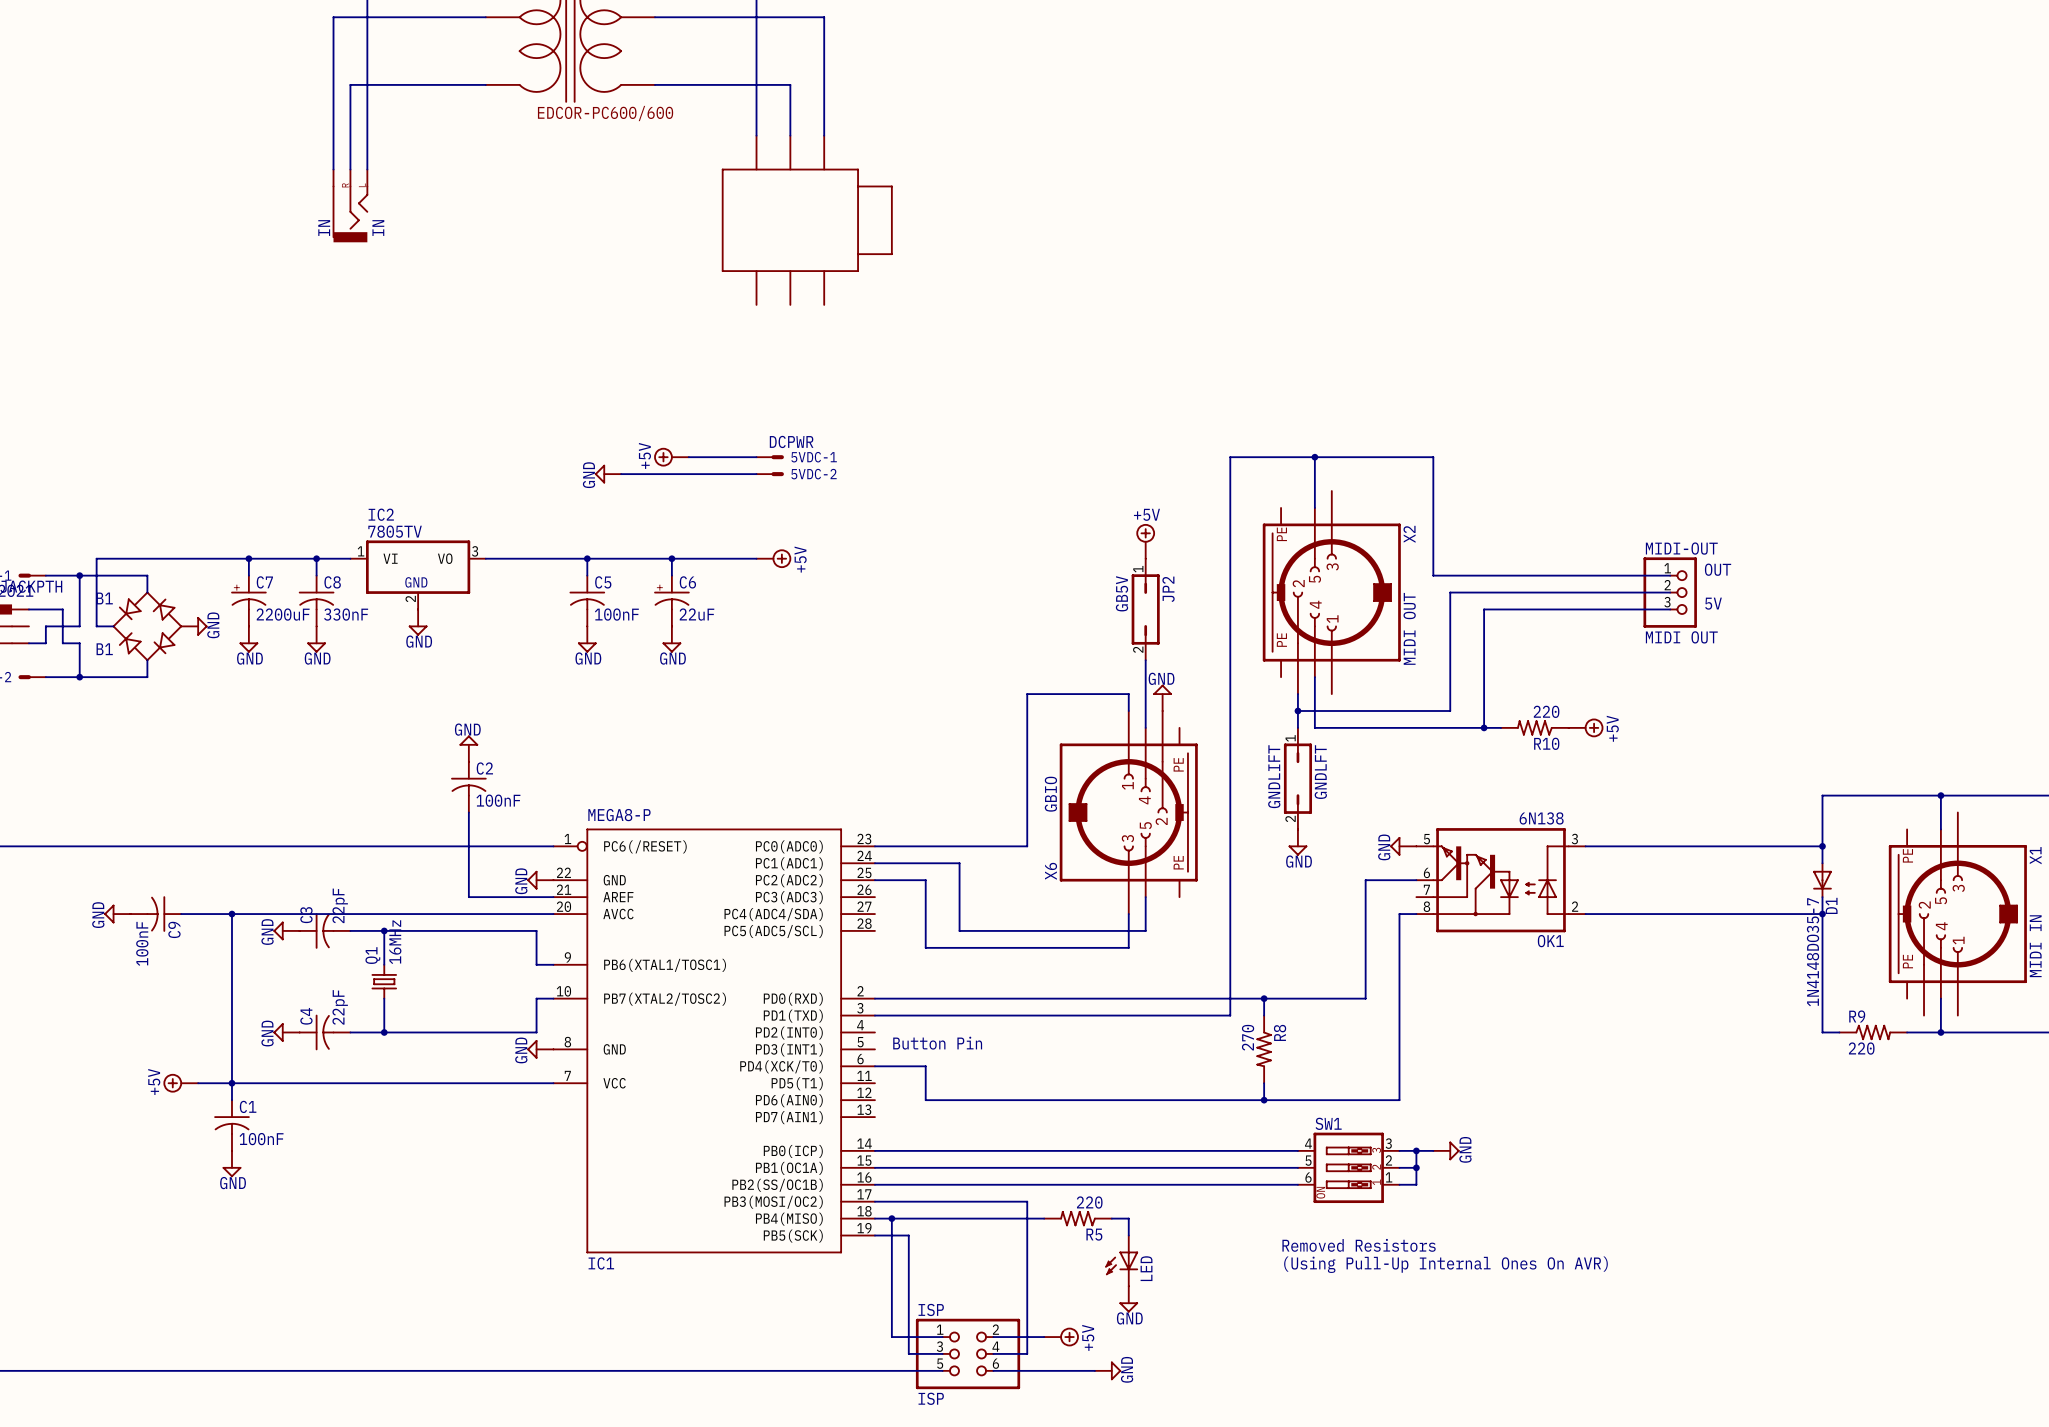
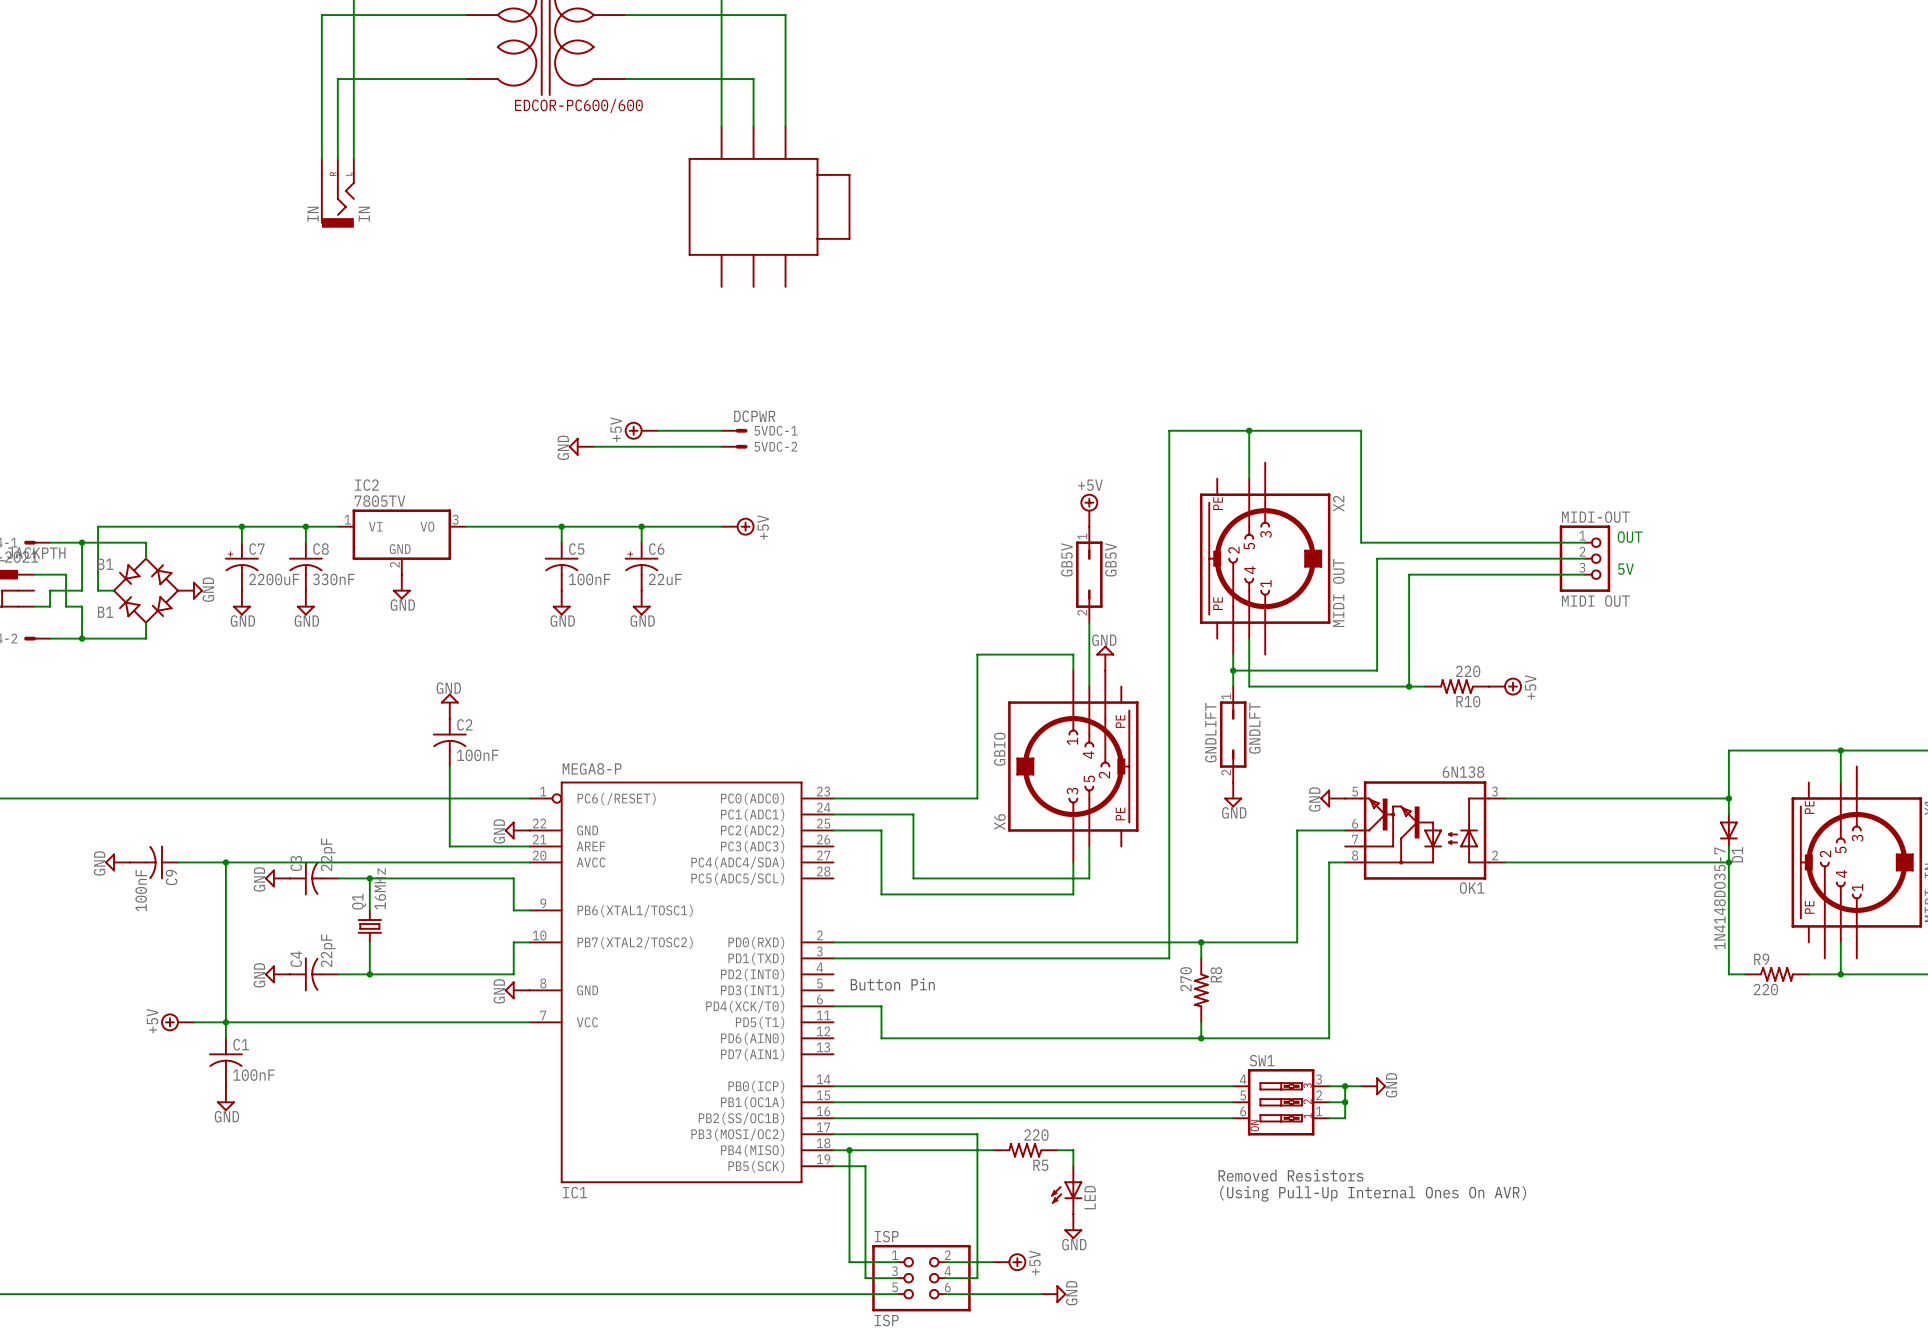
JP2 name: JP2 (1168, 589) -> GB5V (1110, 559)

